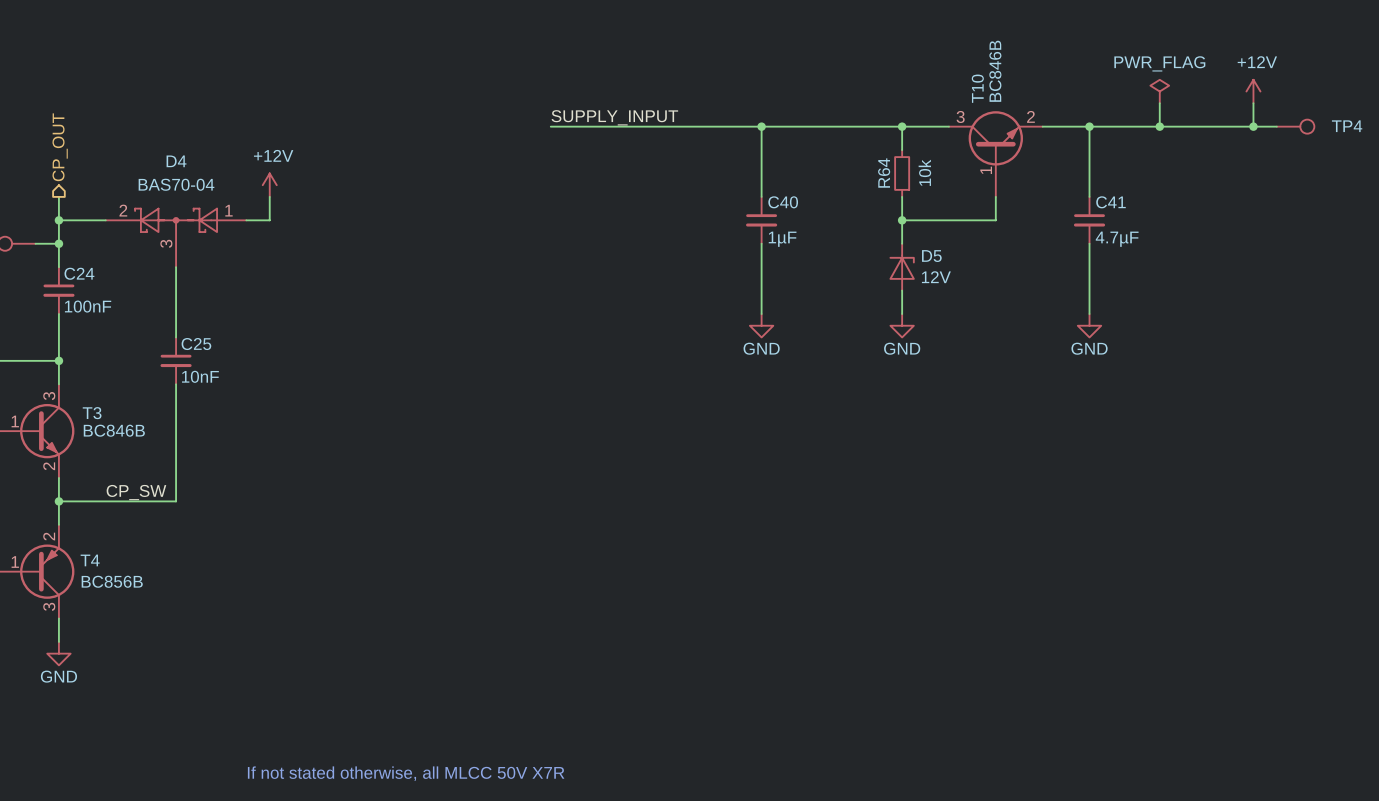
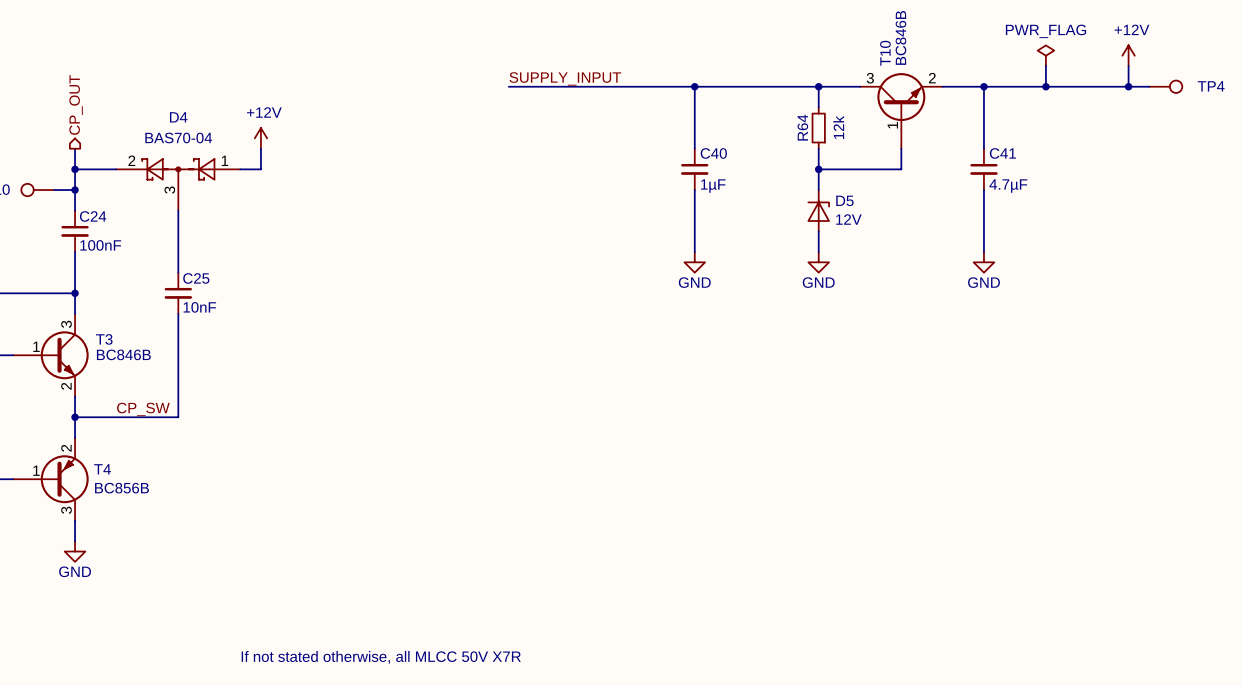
R64 value: 10k (924, 172) -> 12k (838, 127)

